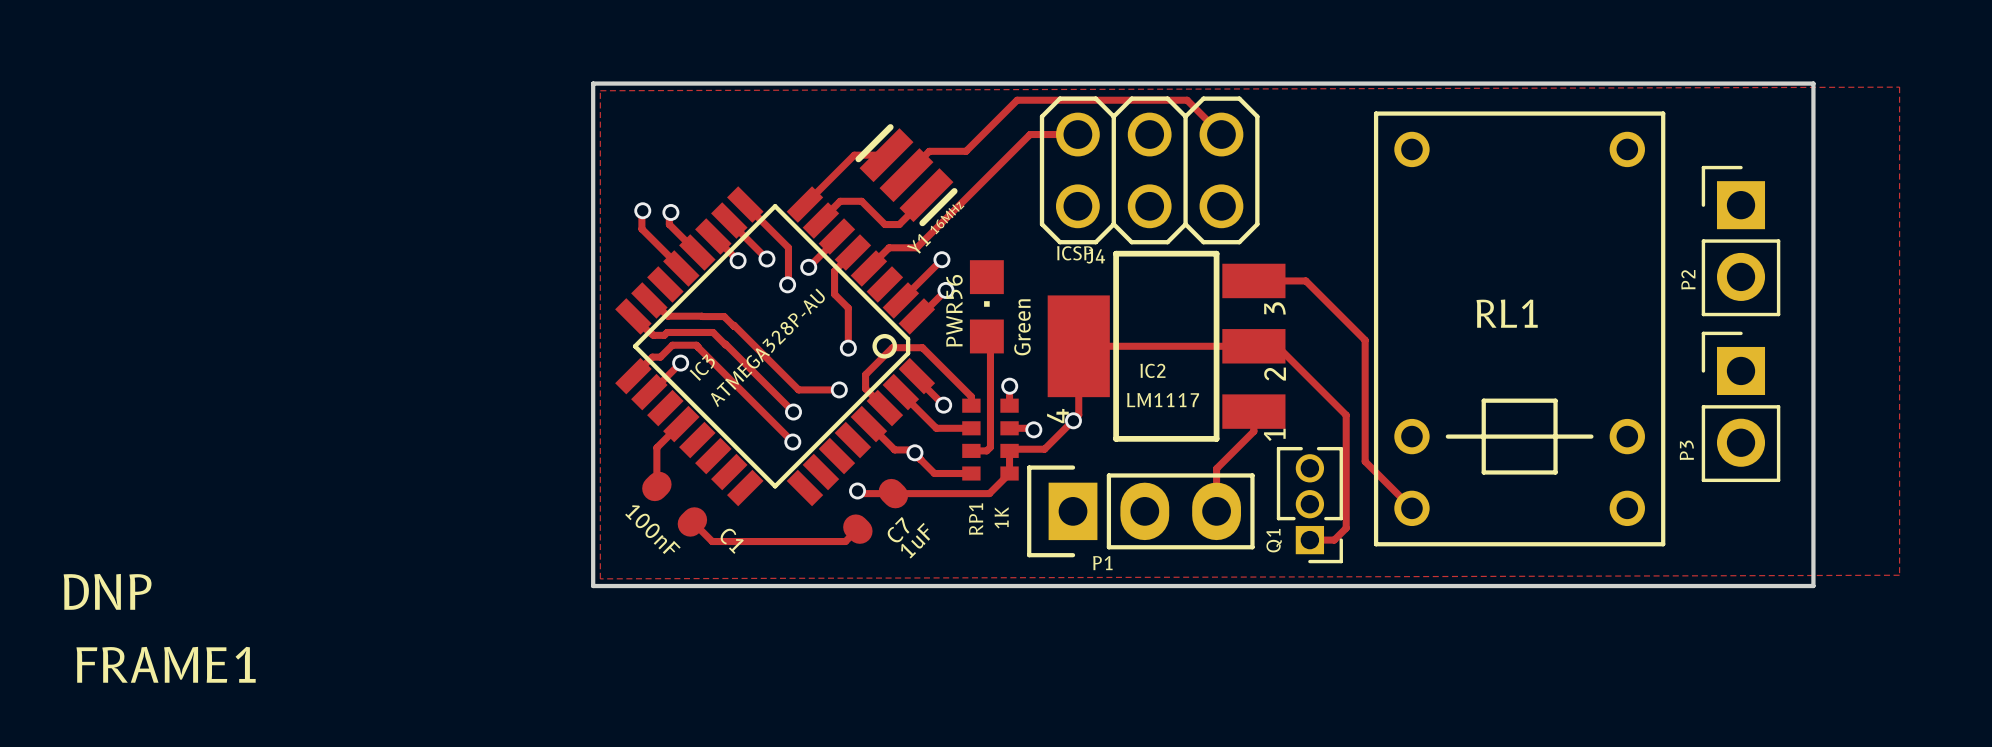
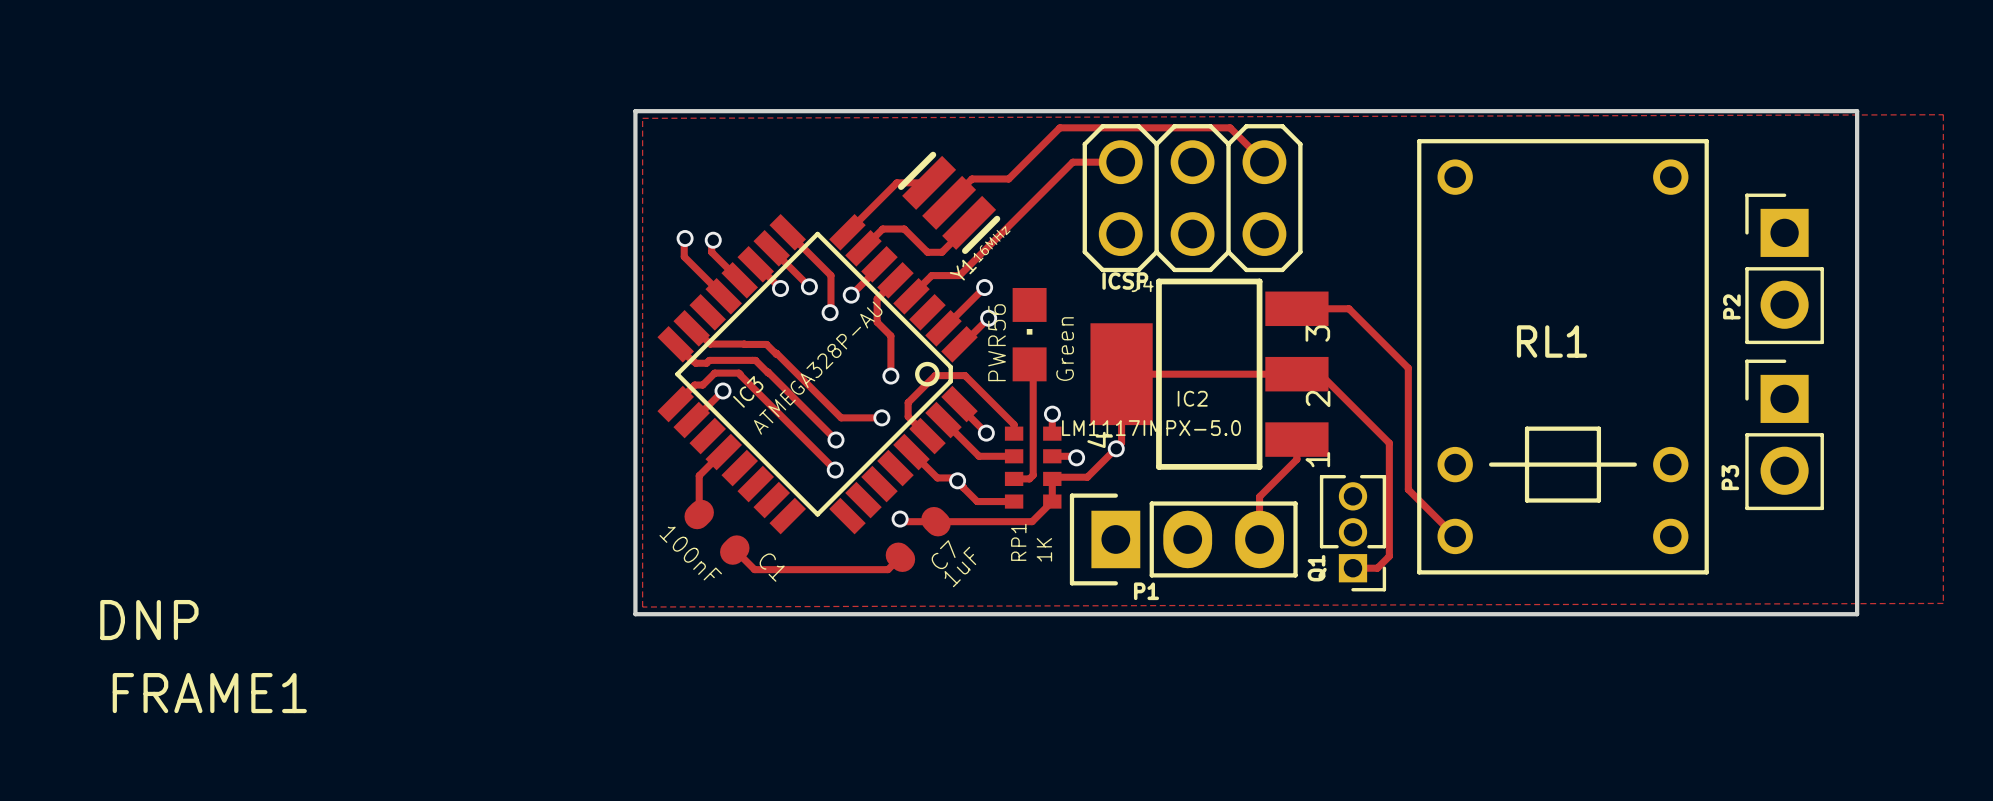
IC2 value: LM1117 (1163, 400) -> LM1117IMPX-5.0 (1151, 428)

